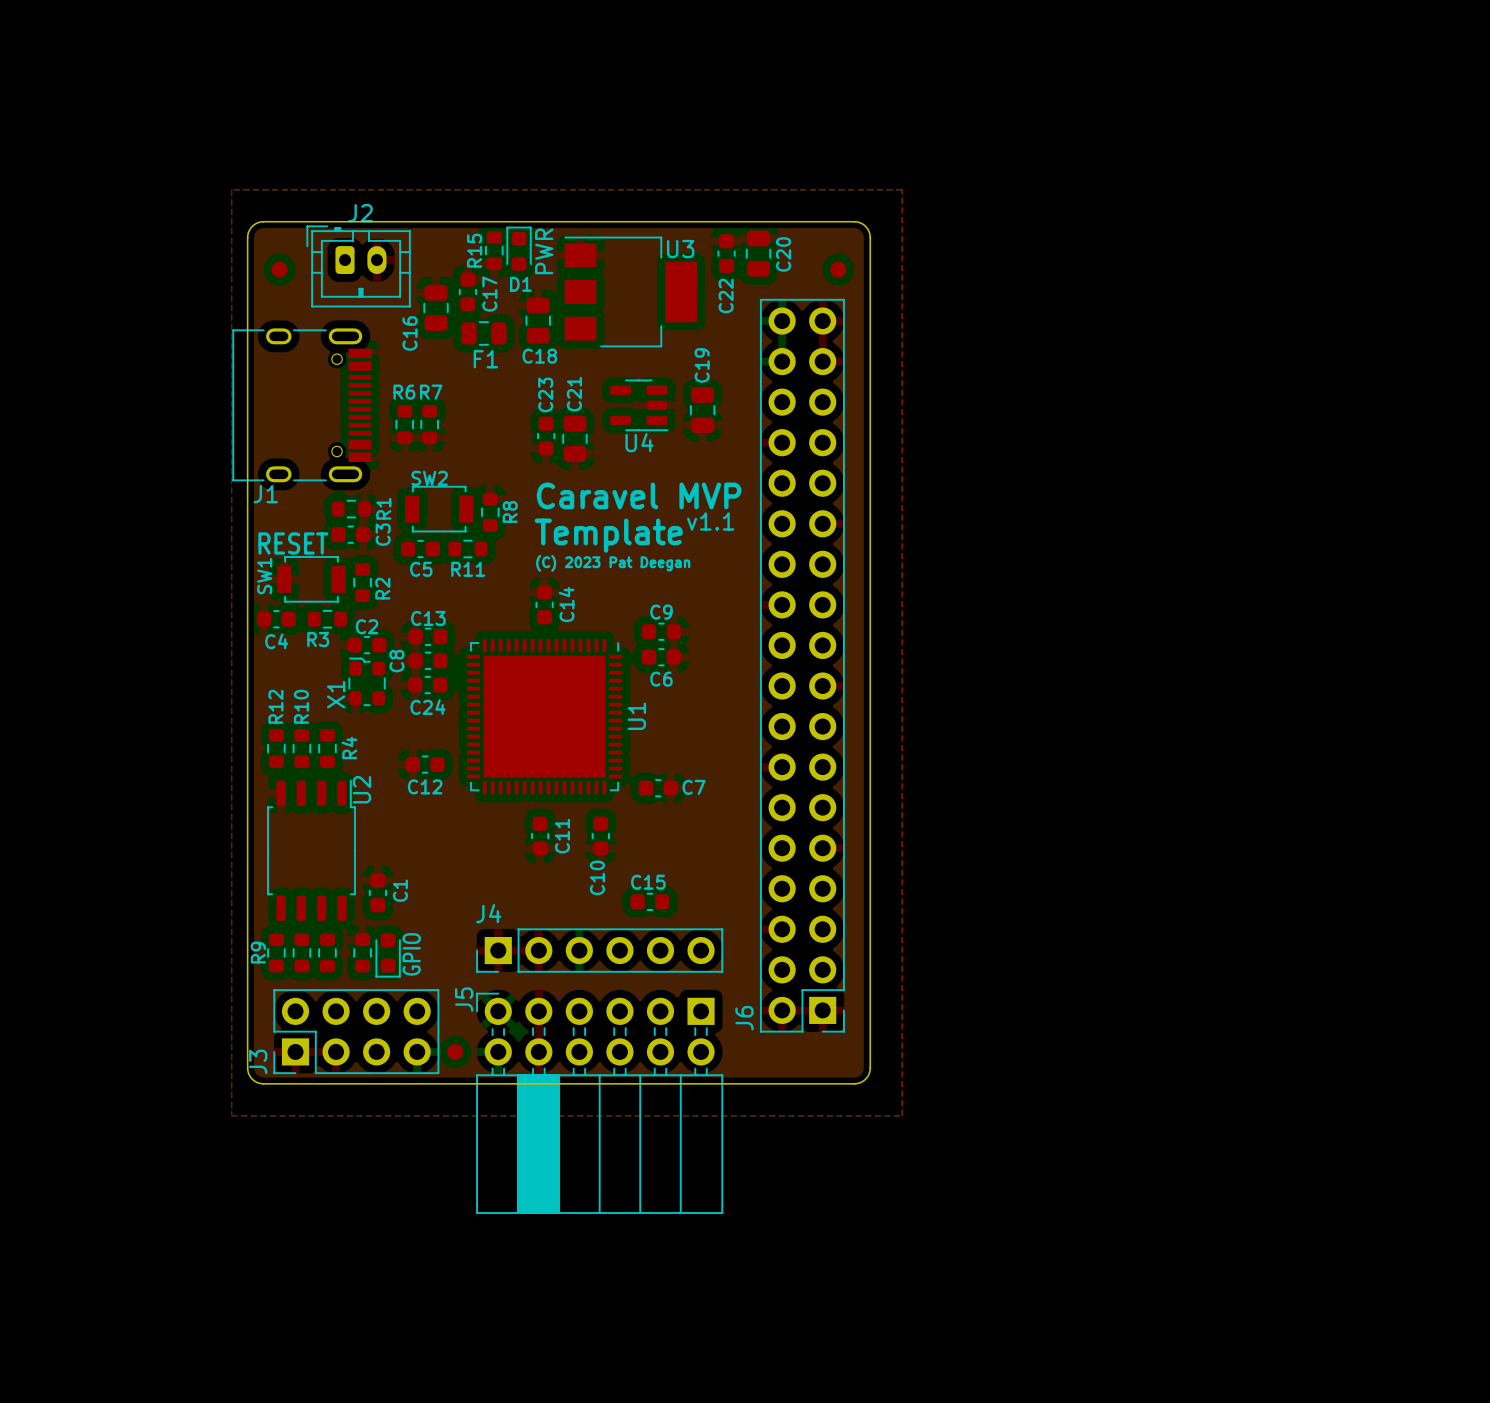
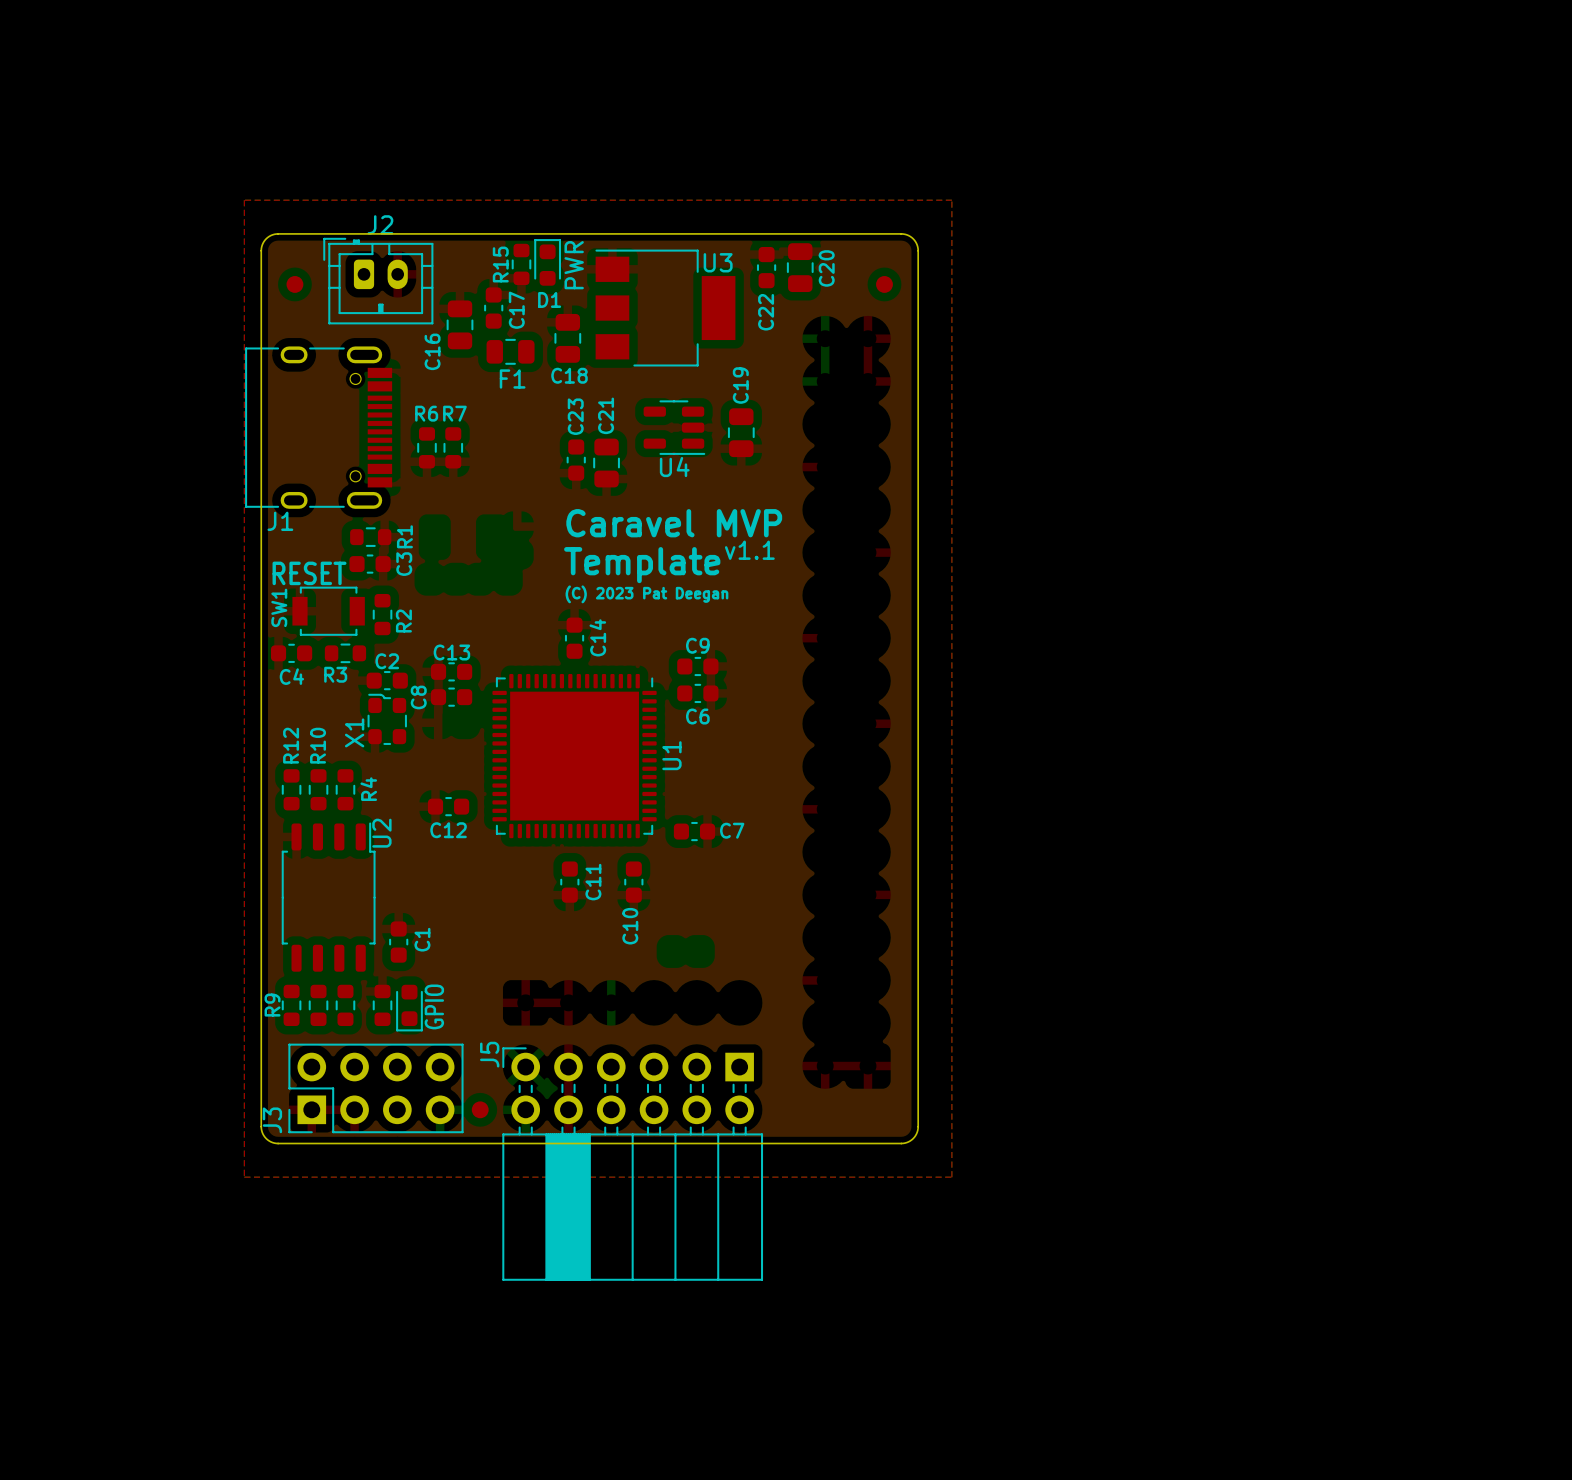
SW2: (439, 509) -> none
R8: (490, 512) -> none
C5: (420, 549) -> none
R11: (467, 549) -> none
J6: (802, 665) -> none
C24: (427, 685) -> none
C15: (649, 901) -> none
J4: (599, 950) -> none

